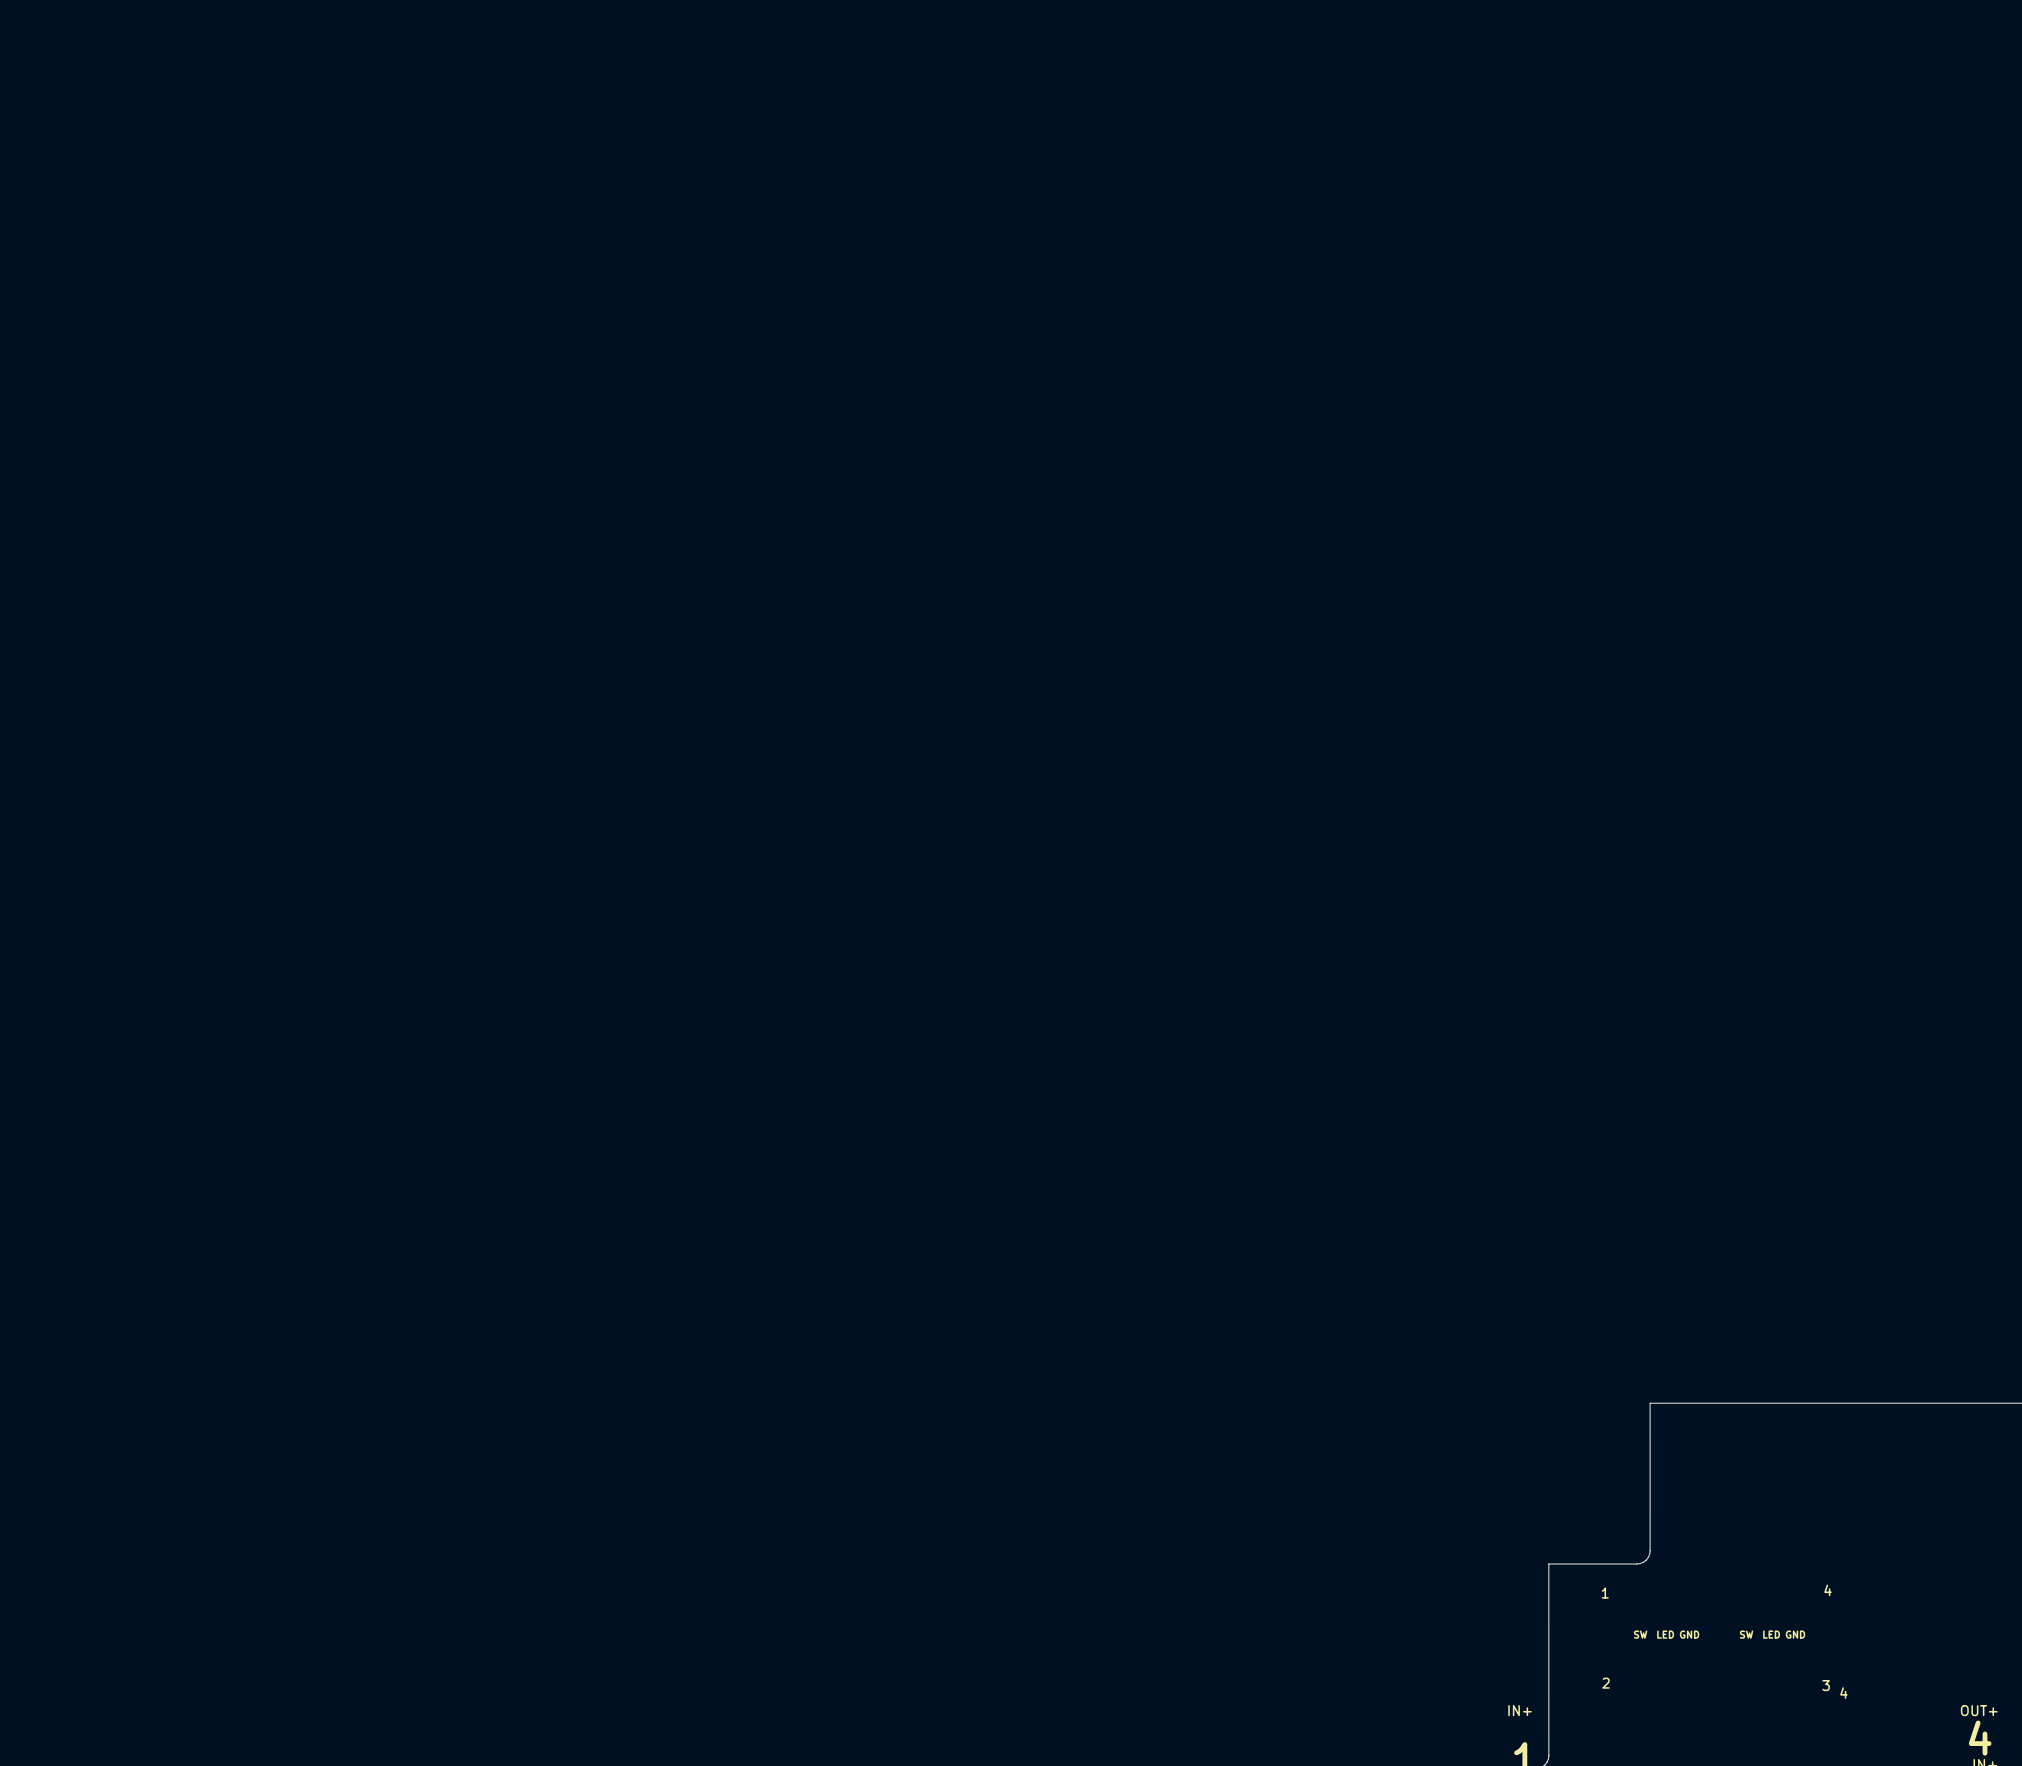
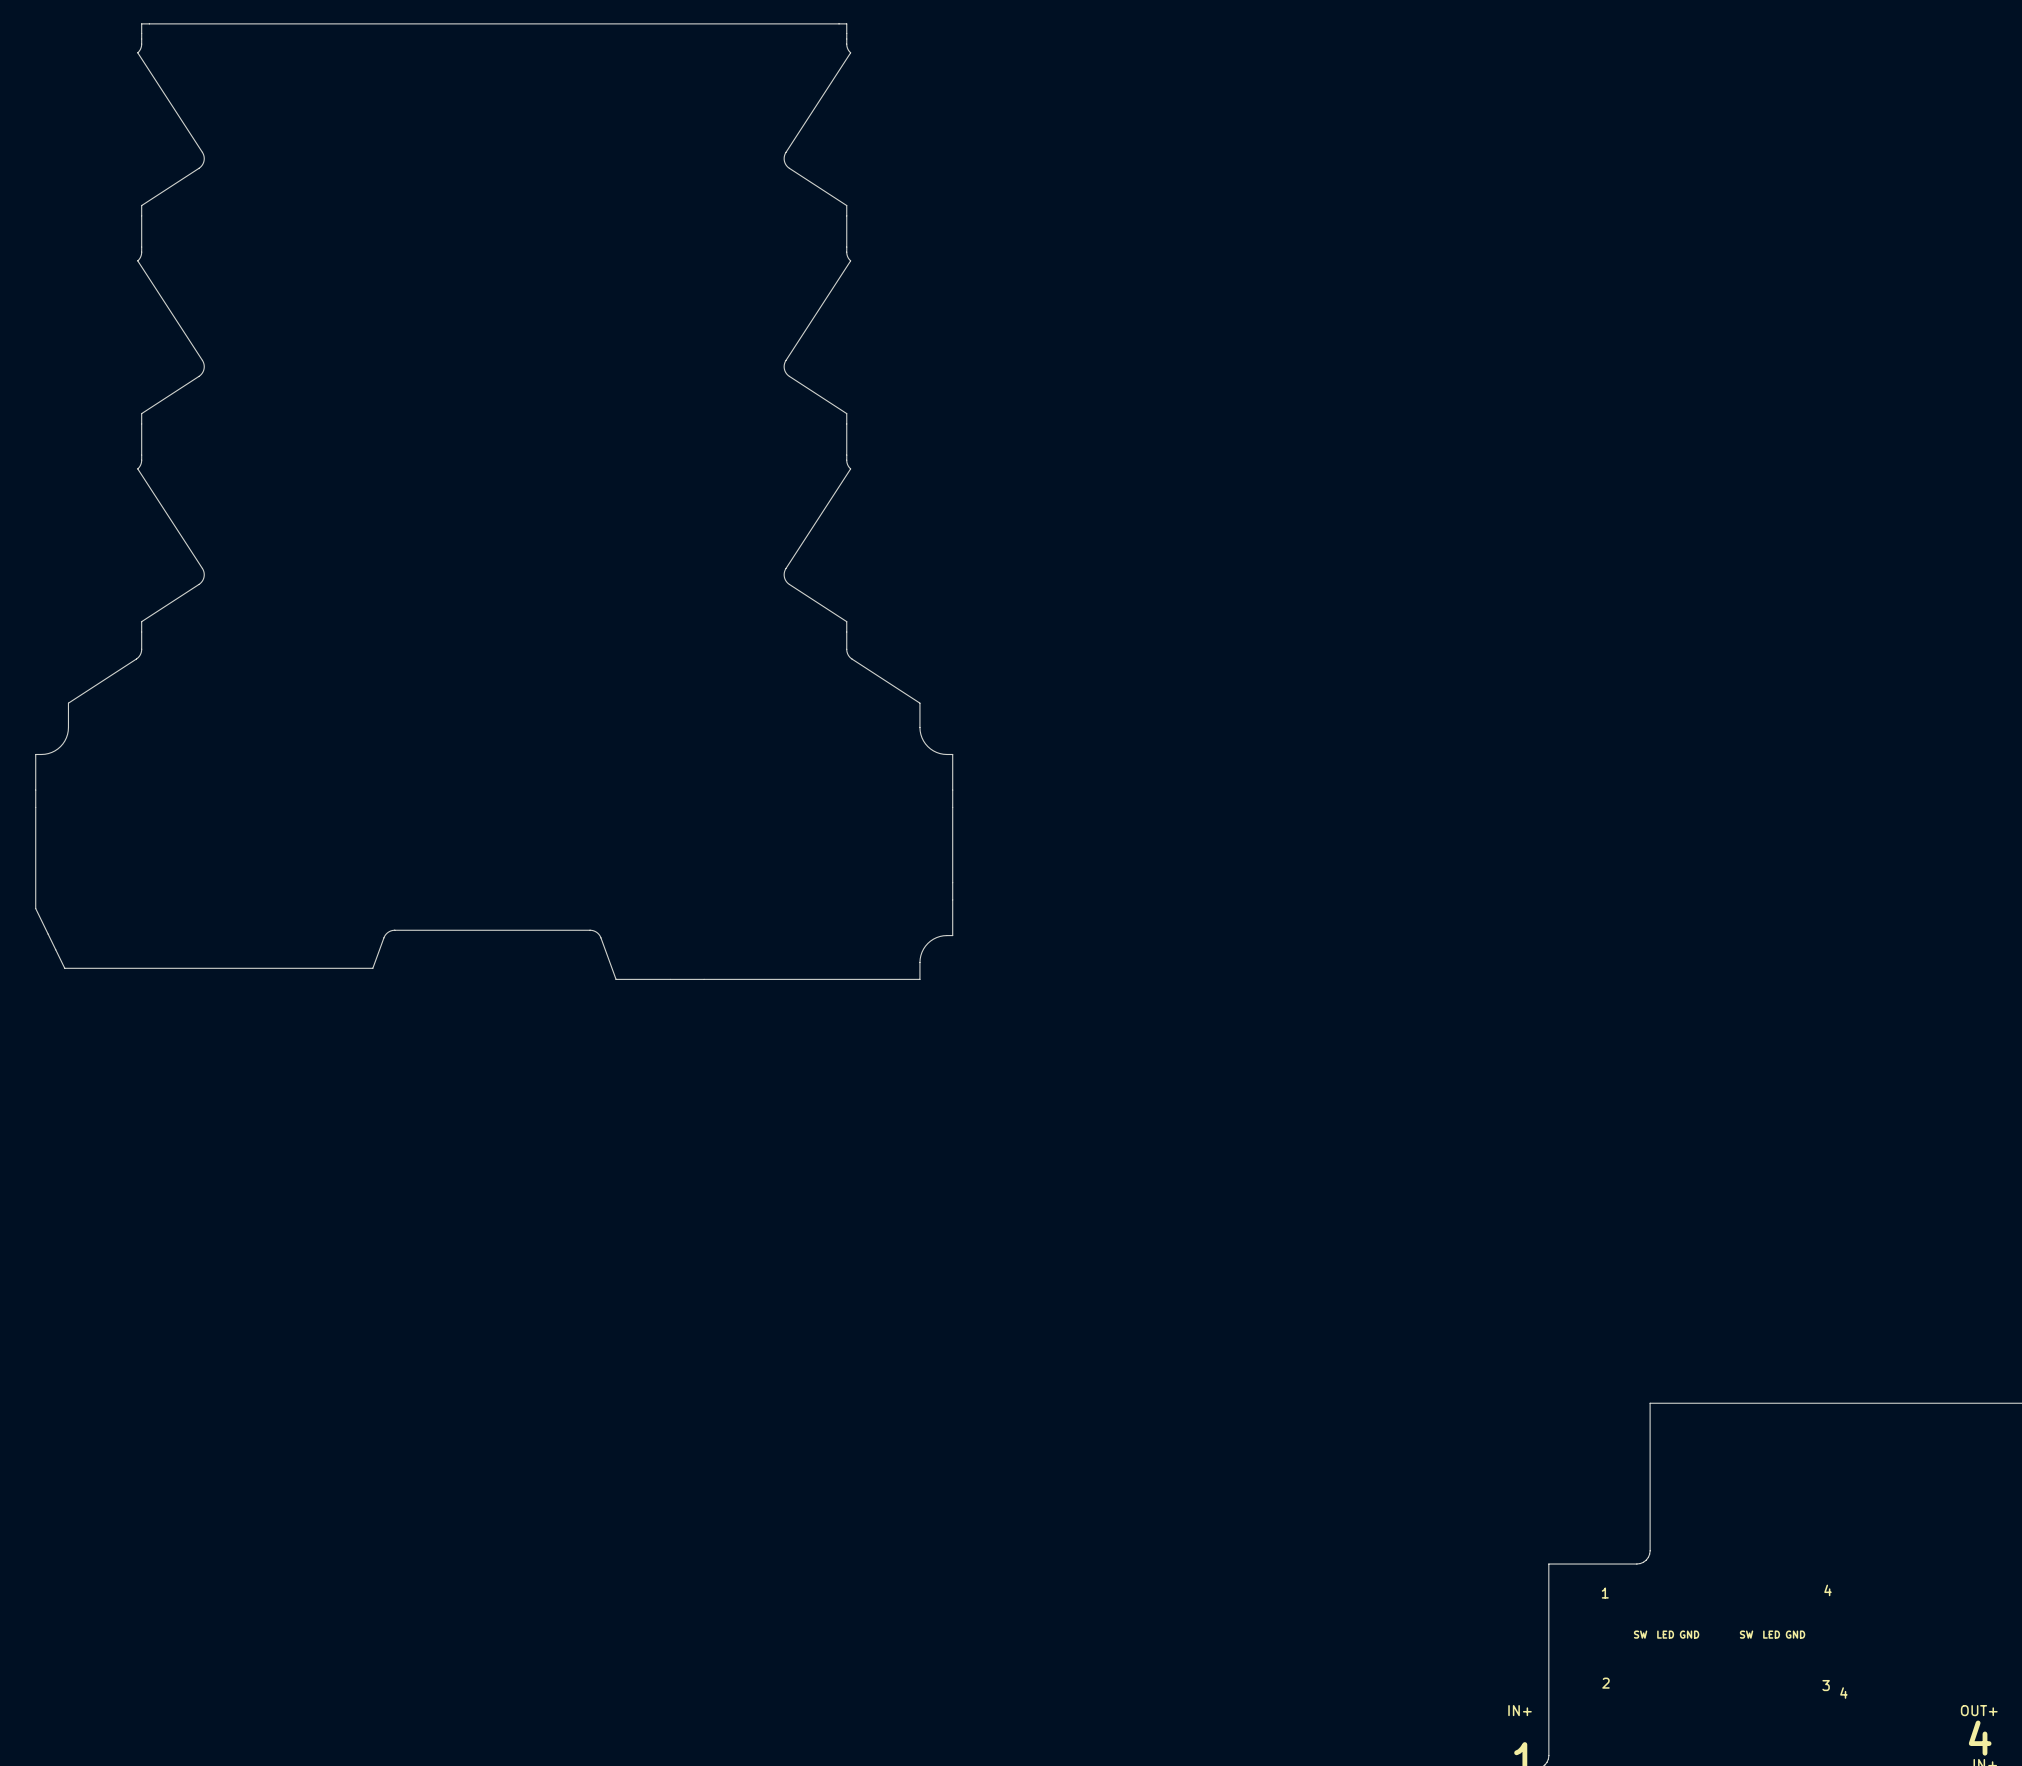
board edge: none -> (141, 23) (846, 23) (846, 45) (850, 52) (786, 152) (784, 159) (789, 168) (846, 205) (846, 253) (850, 260) (784, 366) (788, 375) (846, 413) (846, 461) (850, 468) (786, 568) (784, 575) (789, 584) (846, 621) (846, 650) (848, 656) (919, 703) (920, 731) (923, 741) (936, 752) (952, 754) (952, 935) (936, 937) (925, 946) (920, 959) (919, 979) (616, 979) (600, 936) (595, 931) (590, 930) (393, 930) (384, 936) (372, 968) (64, 968) (35, 908) (35, 754) (51, 752) (64, 741) (68, 731) (68, 703) (139, 656) (141, 650) (141, 621) (199, 584) (204, 575) (202, 568) (137, 468) (141, 461) (141, 413) (200, 375) (204, 366) (137, 260) (141, 253) (141, 205) (199, 168) (204, 159) (202, 152) (137, 52) (141, 45) (141, 23)

